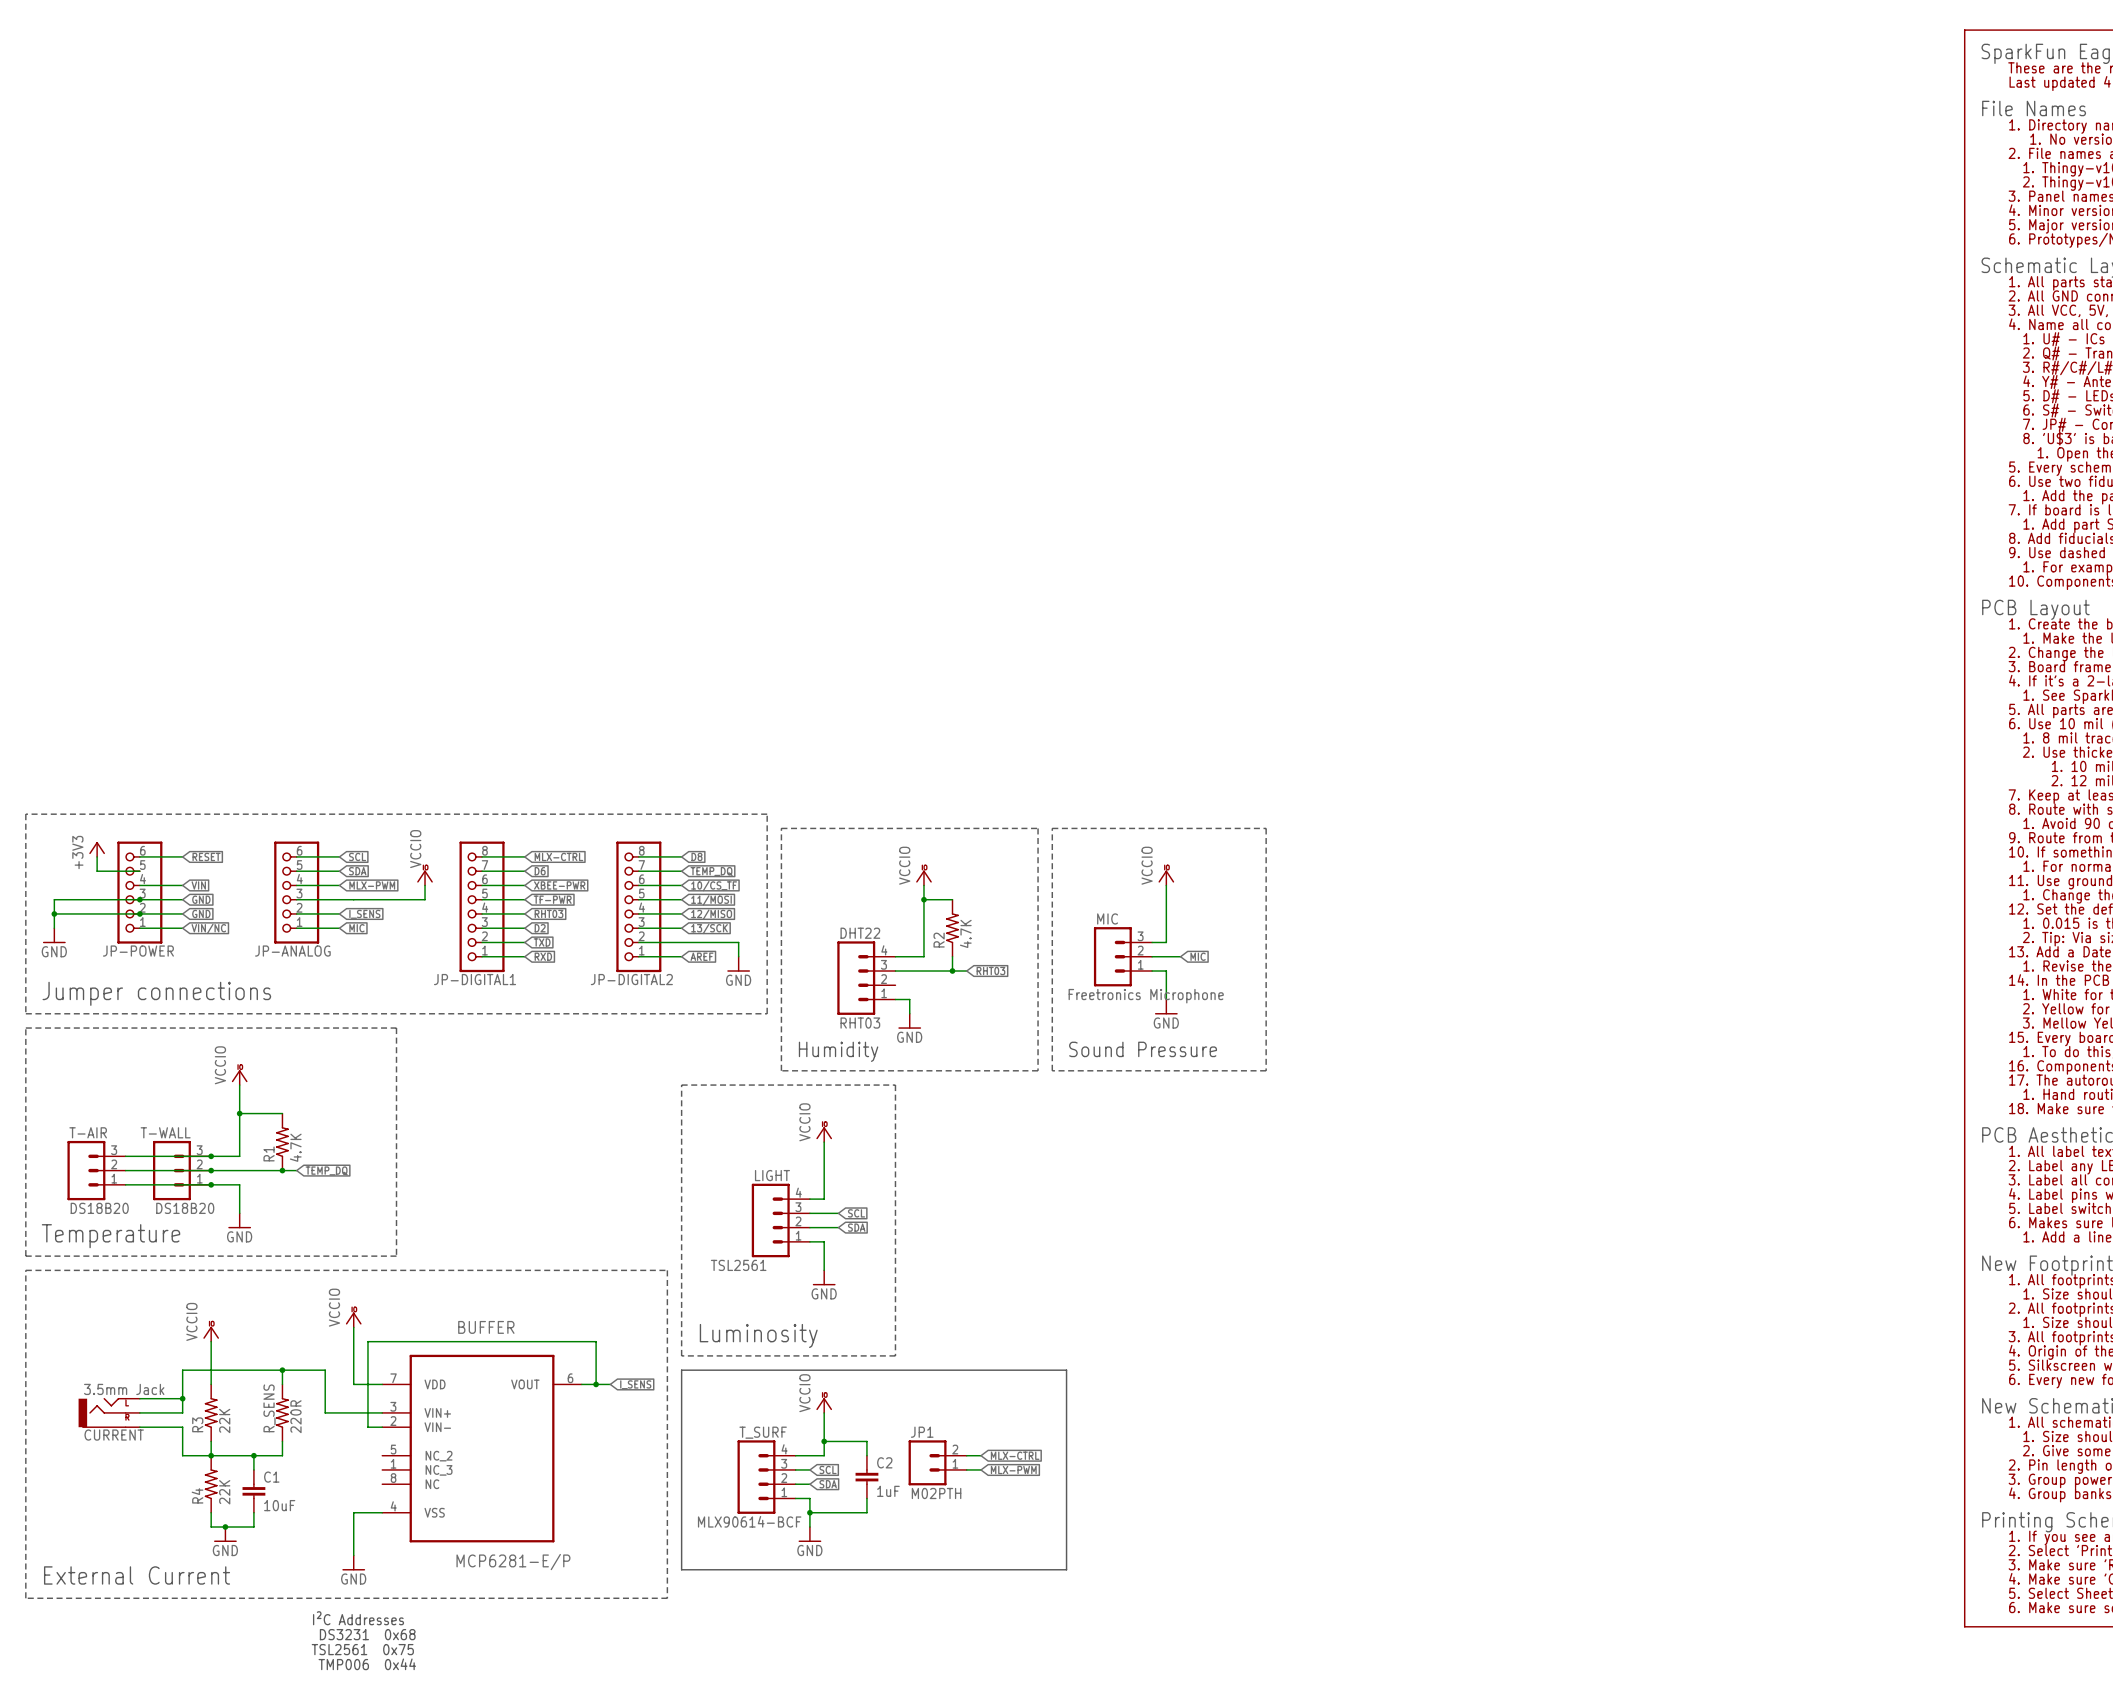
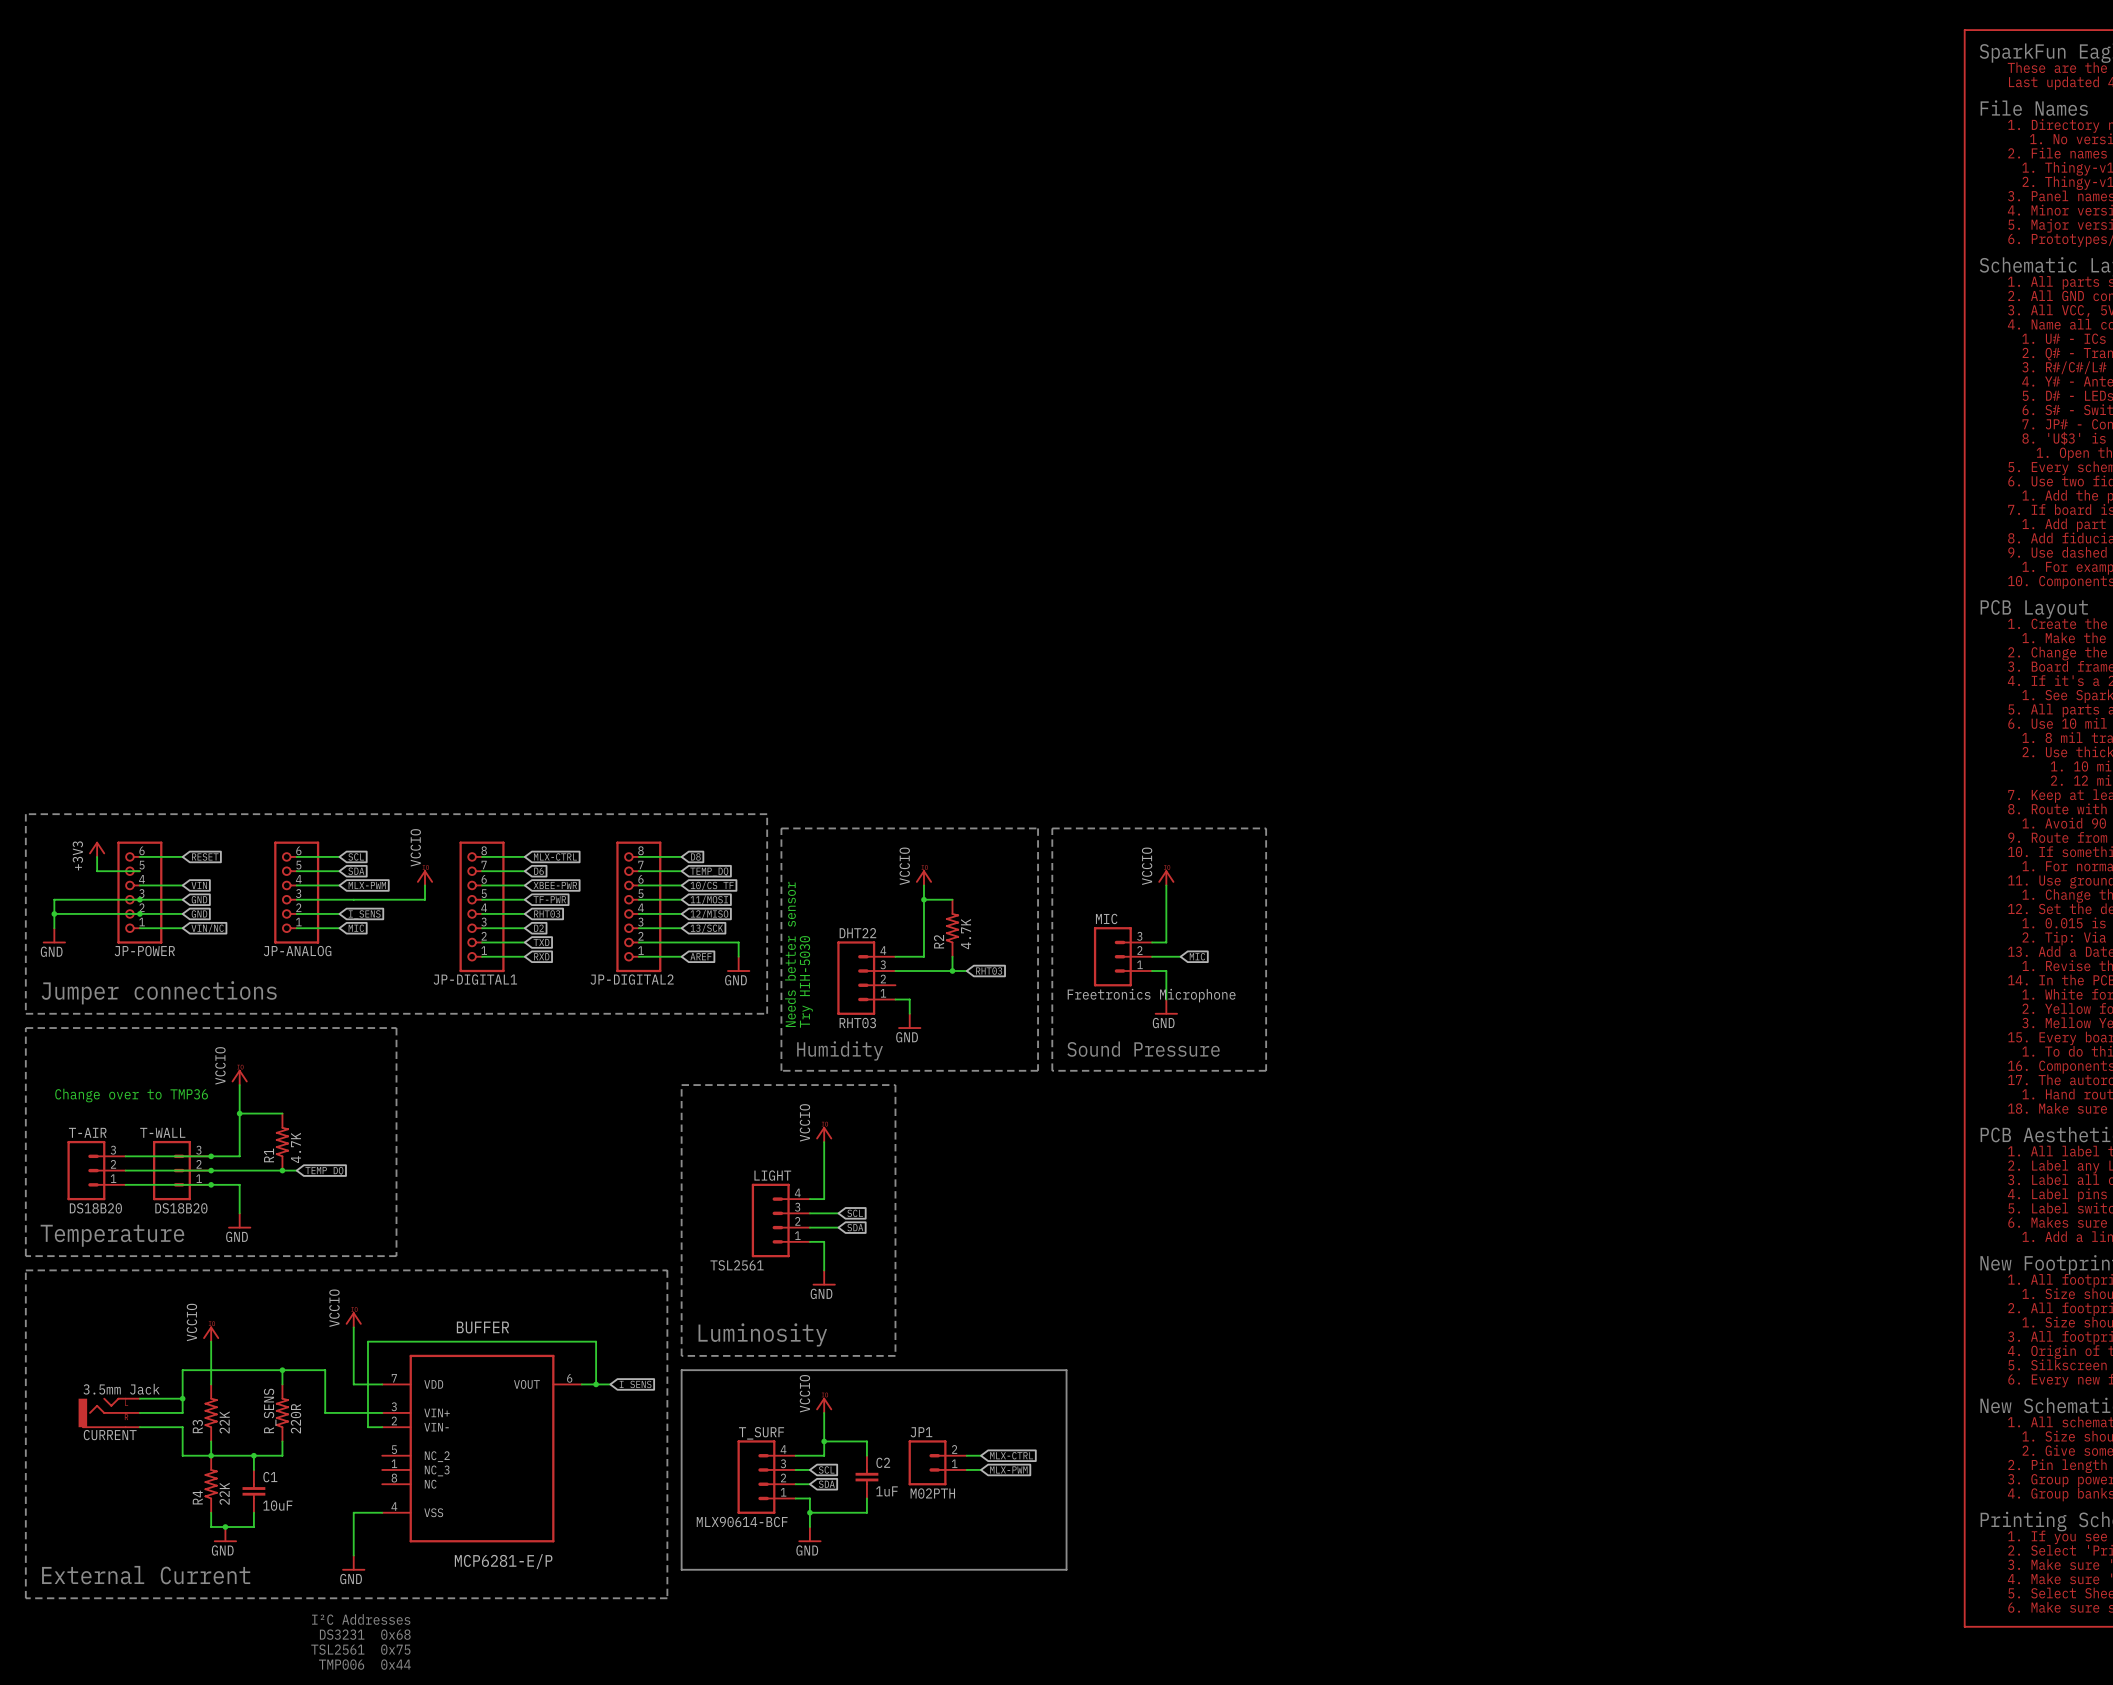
text: none -> Needs better sensor (790, 954)
text: none -> Try HIH-5030 (806, 981)
text: none -> Change over to TMP36 (131, 1095)

